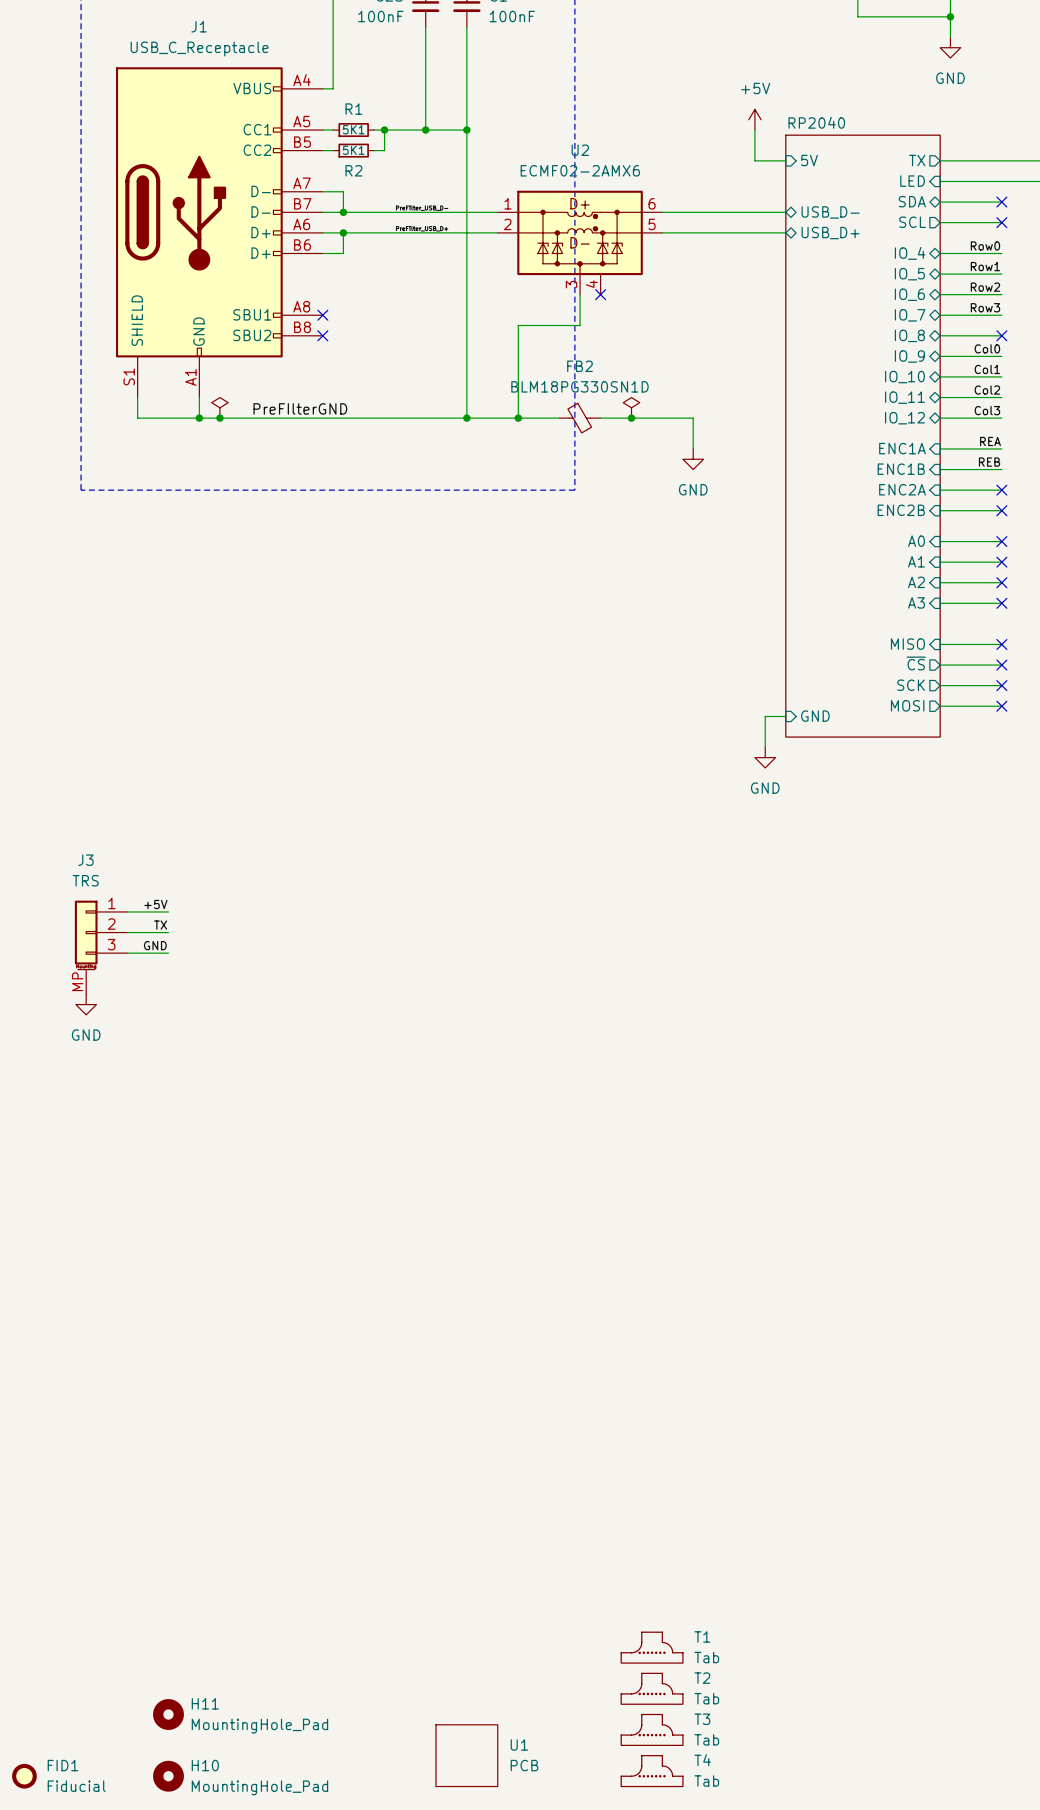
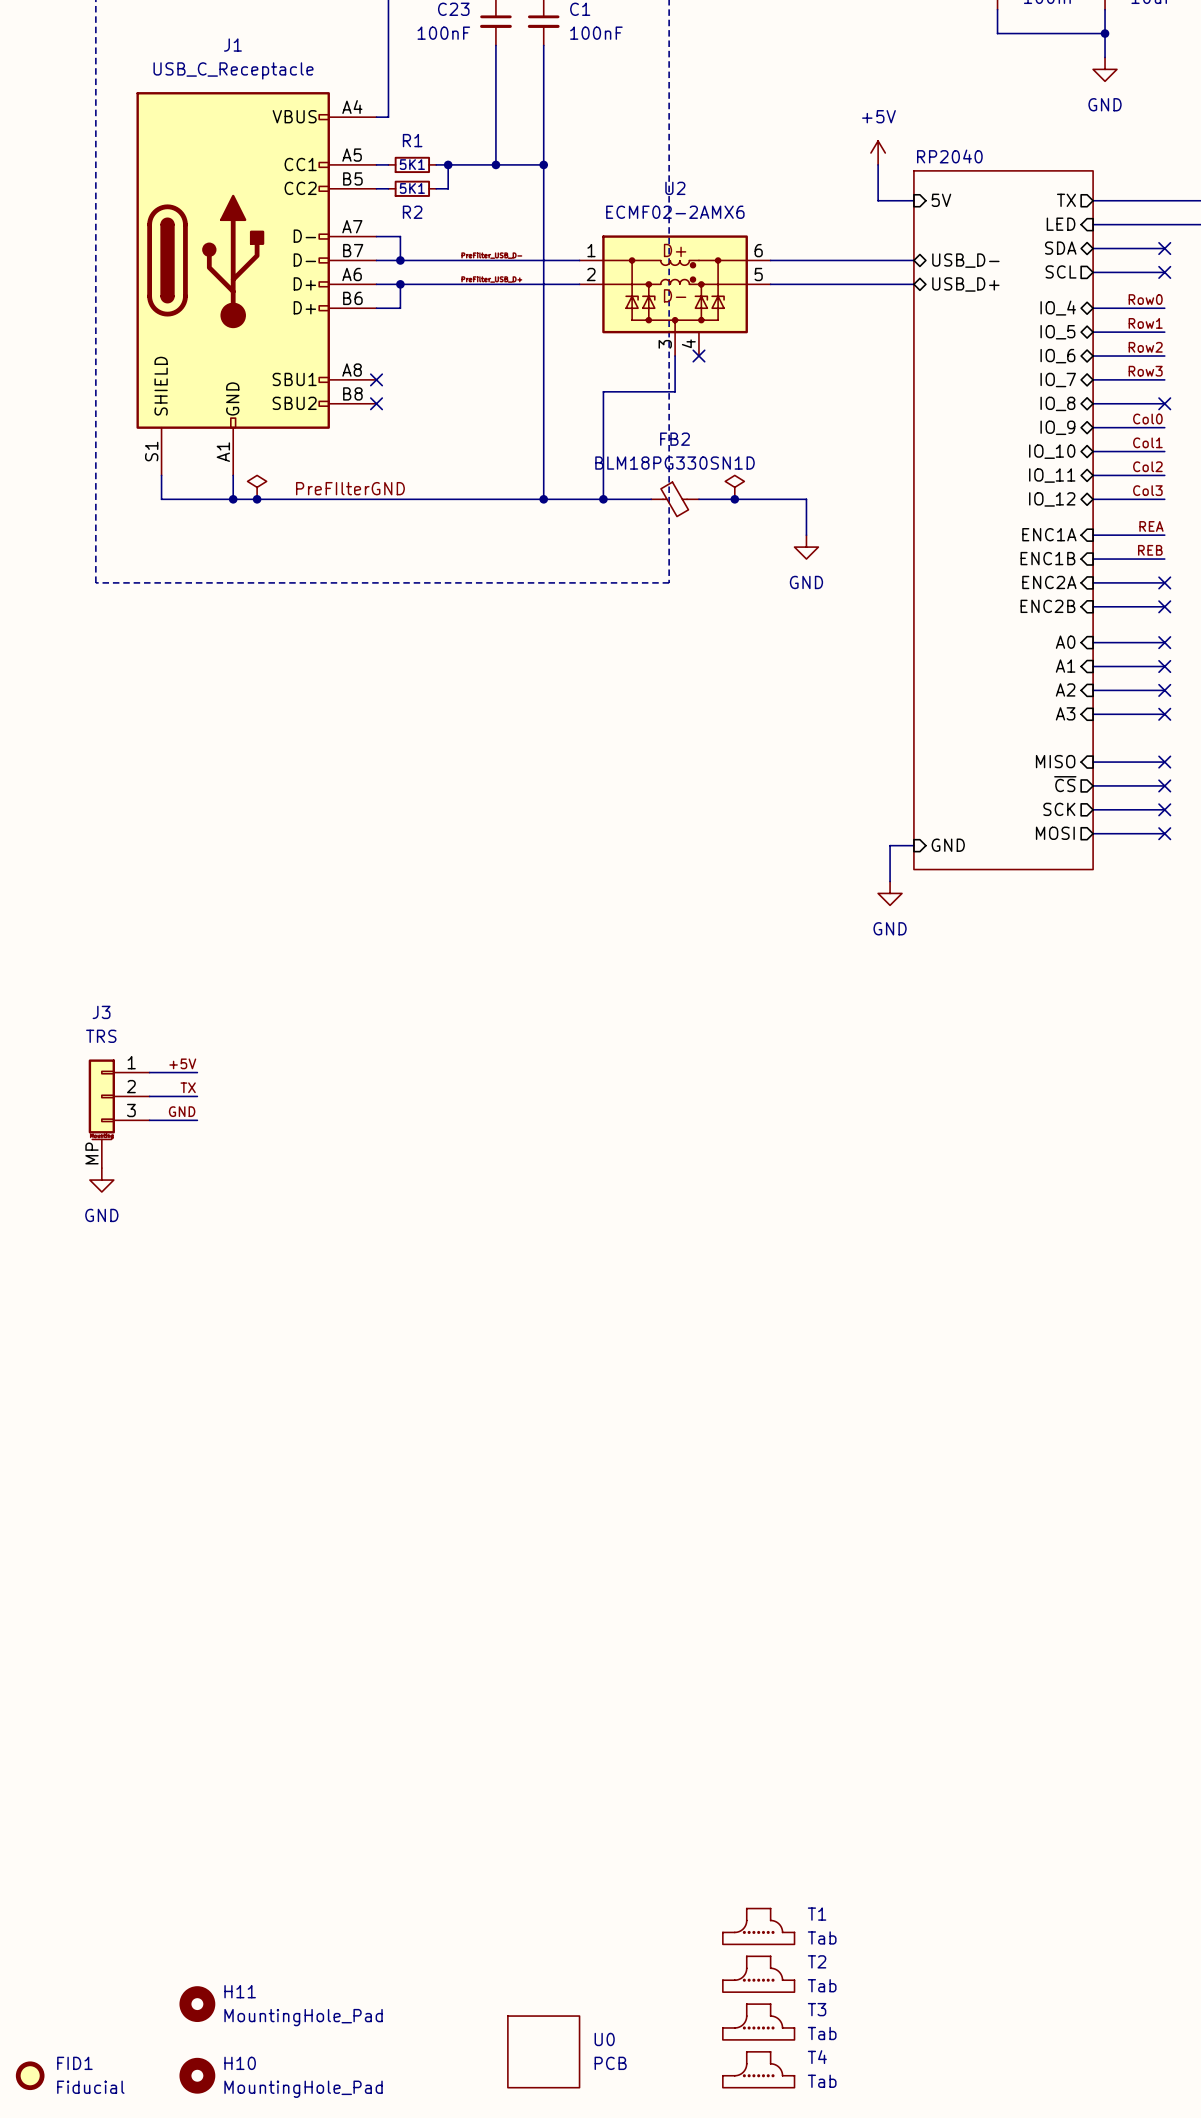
U1 name: U1 (519, 1744) -> U0 (604, 2039)

